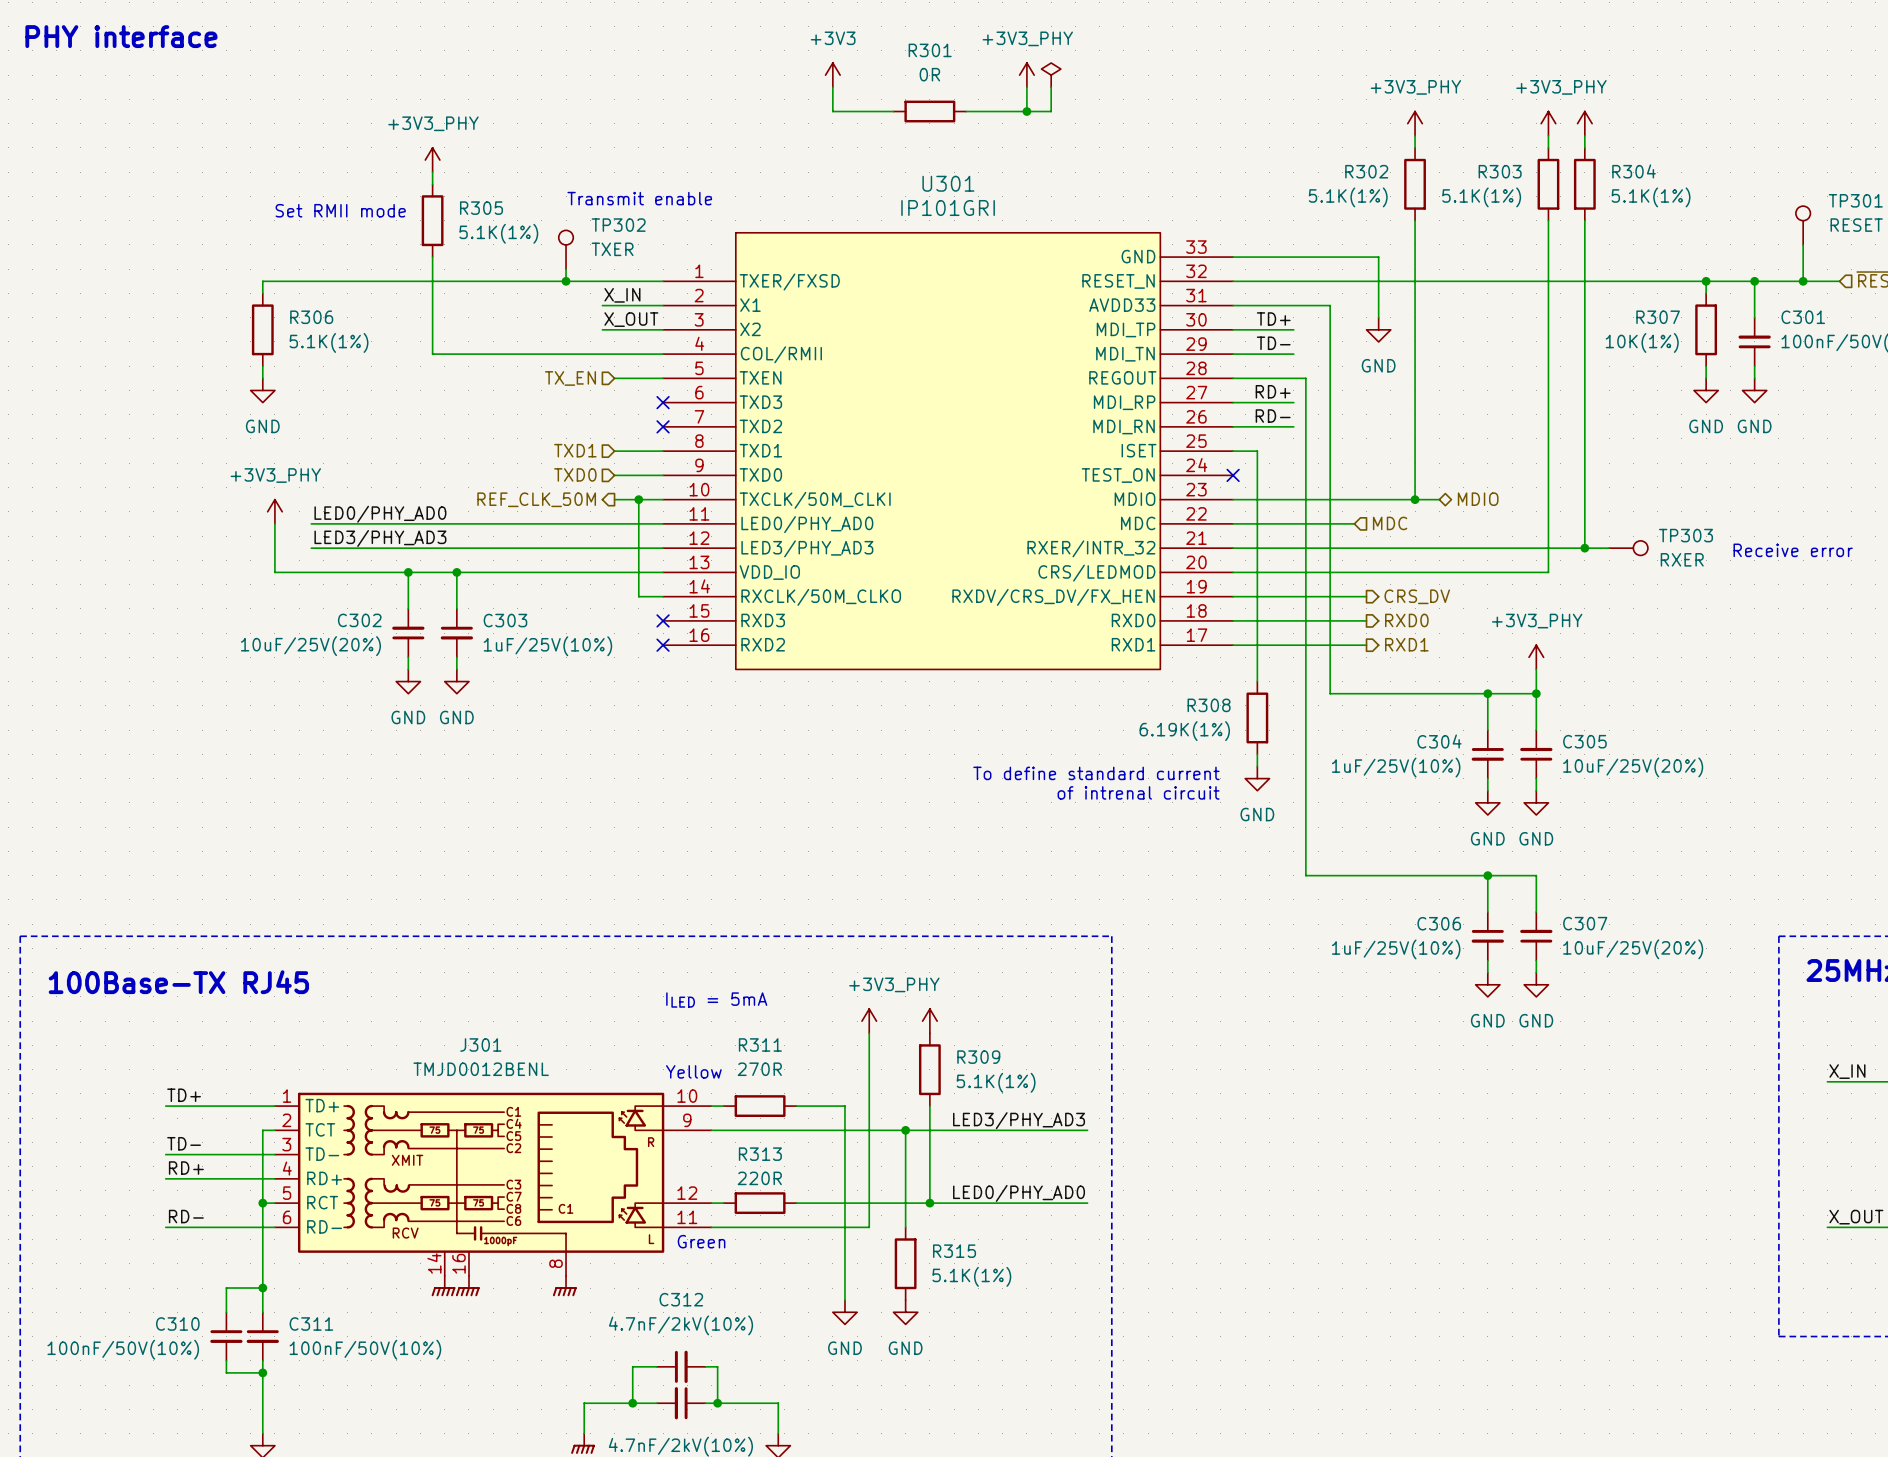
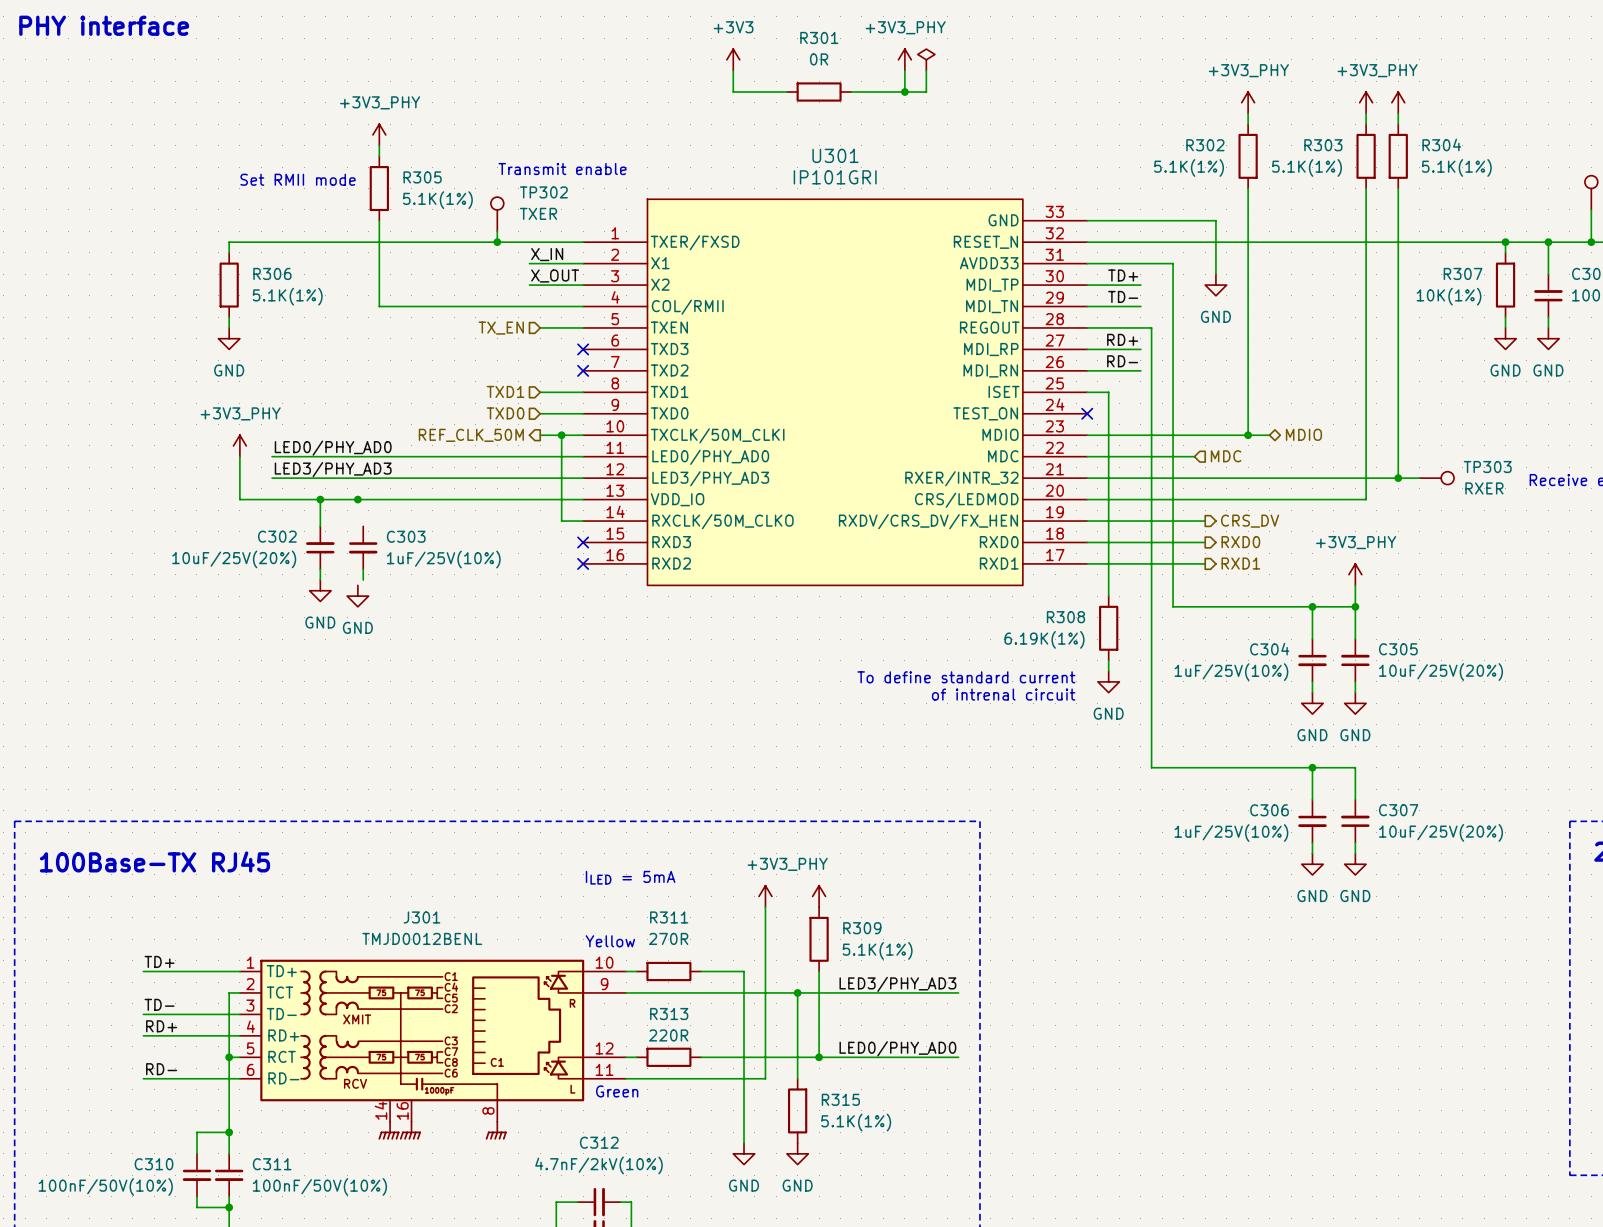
wire: none -> (320, 499) (320, 526)
junction: none -> (320, 499)
wire: (408, 572) (408, 608) -> none
wire: (456, 572) (456, 608) -> none
junction: (456, 572) -> none
C302 position: (408, 633) -> (320, 547)
C303 position: (456, 633) -> (363, 547)
wire: (408, 657) (408, 669) -> (320, 569) (320, 580)
wire: (456, 657) (456, 669) -> (363, 569) (363, 580)
power symbol position: GND (456, 681) -> GND (320, 590)

